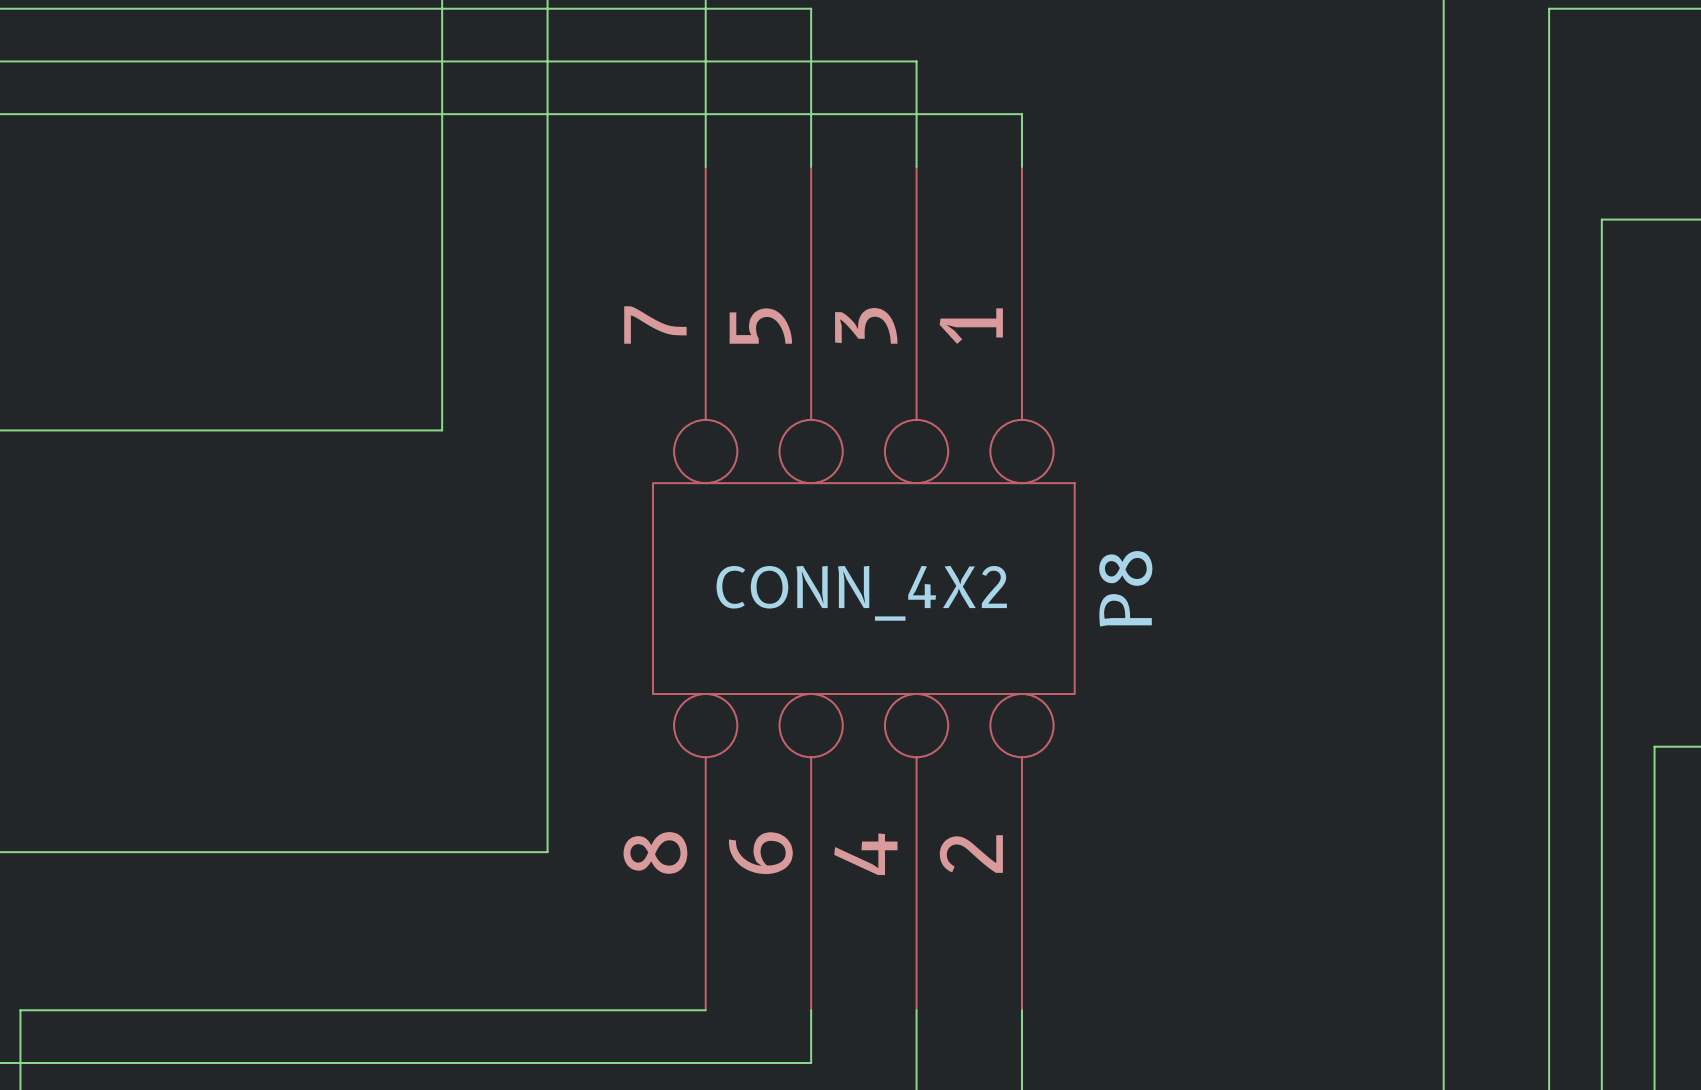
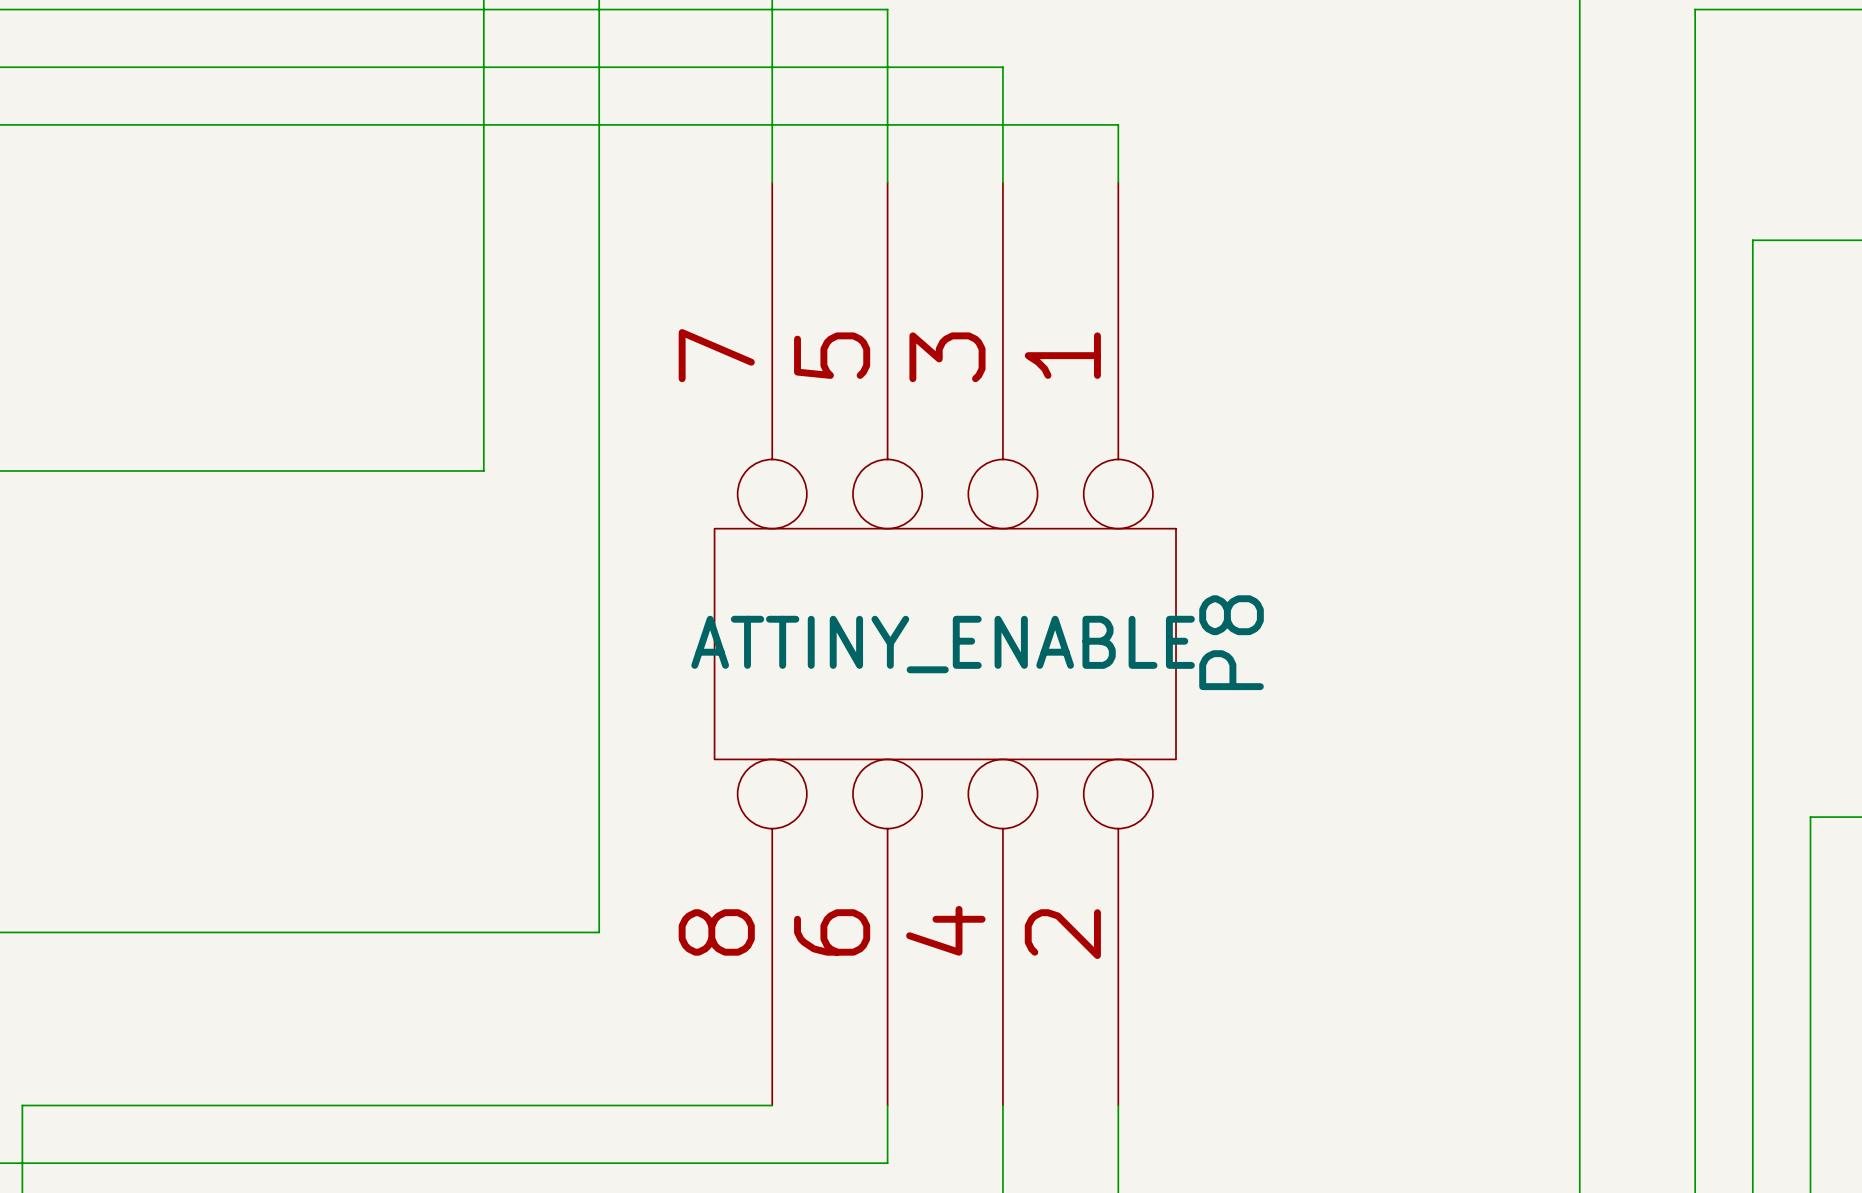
P8 value: CONN_4X2 (861, 593) -> ATTINY_ENABLE (943, 644)

